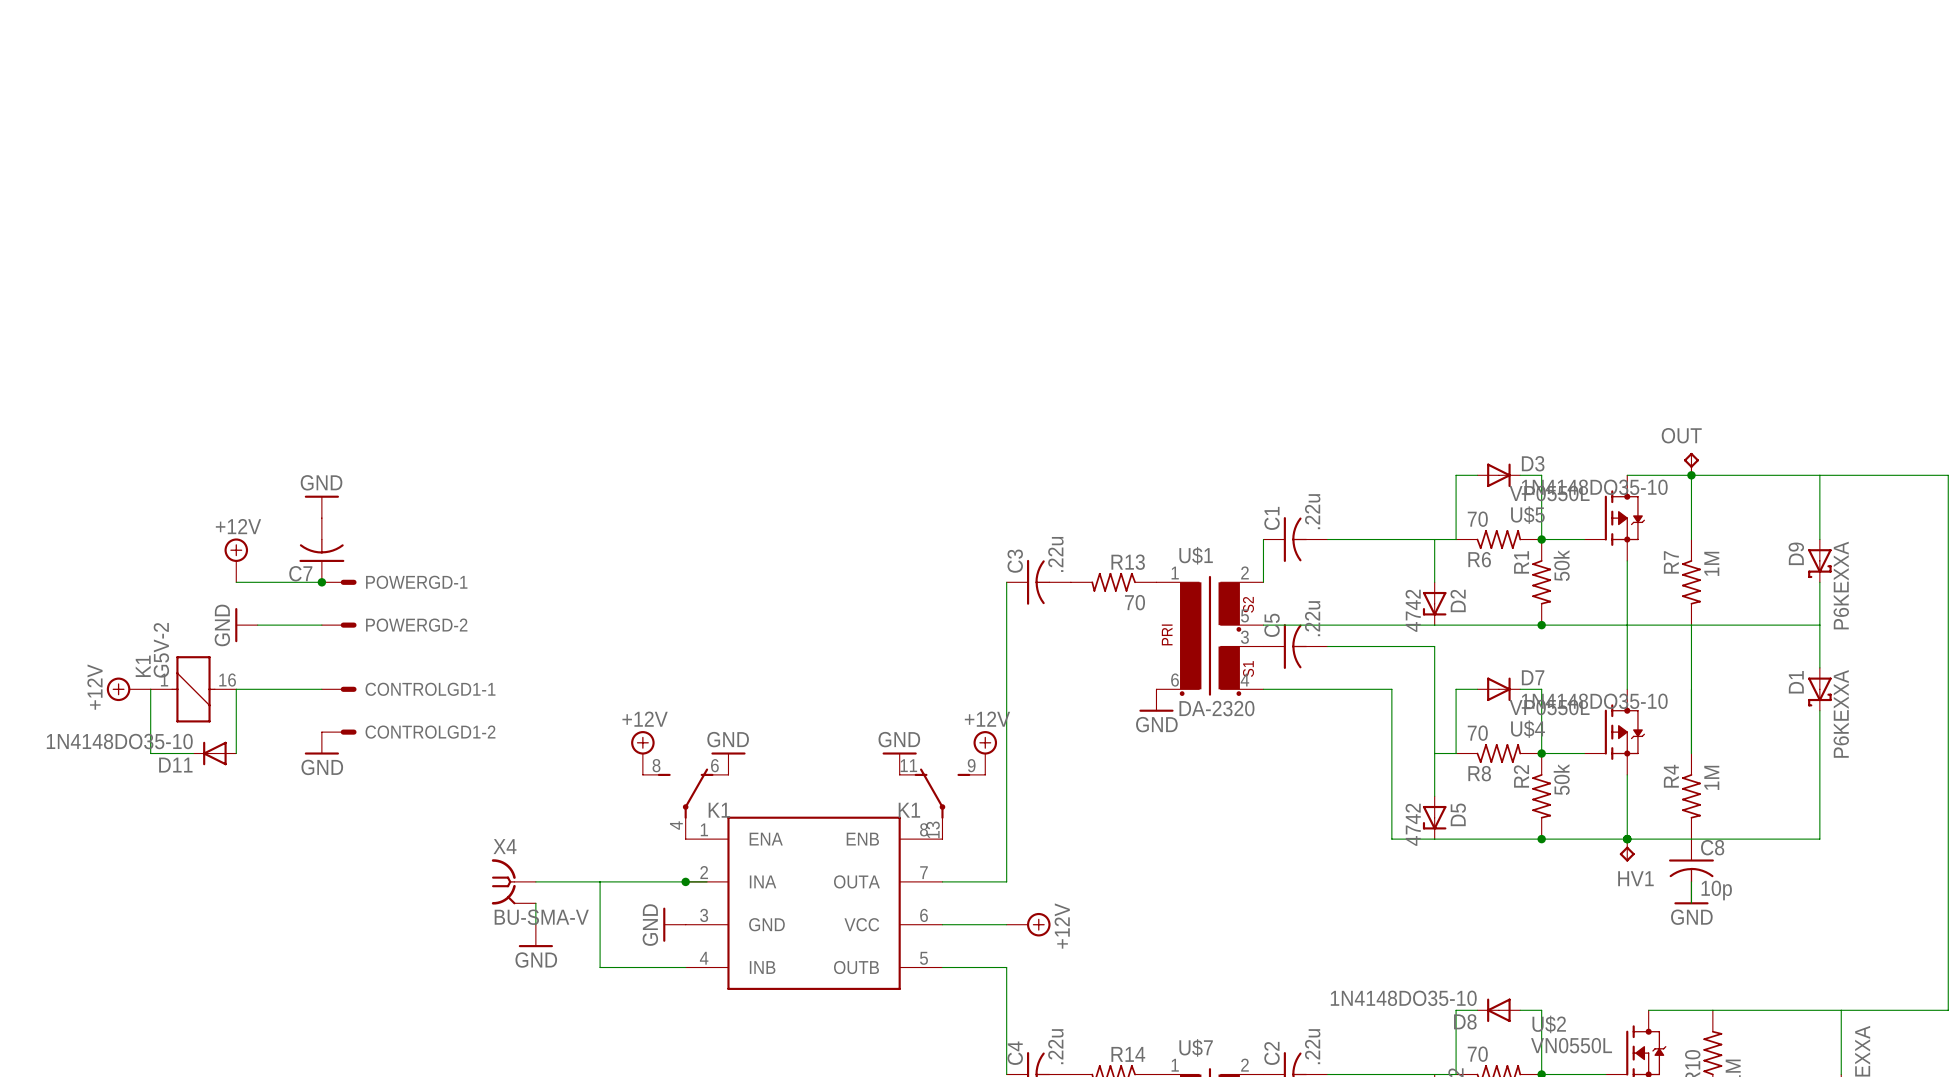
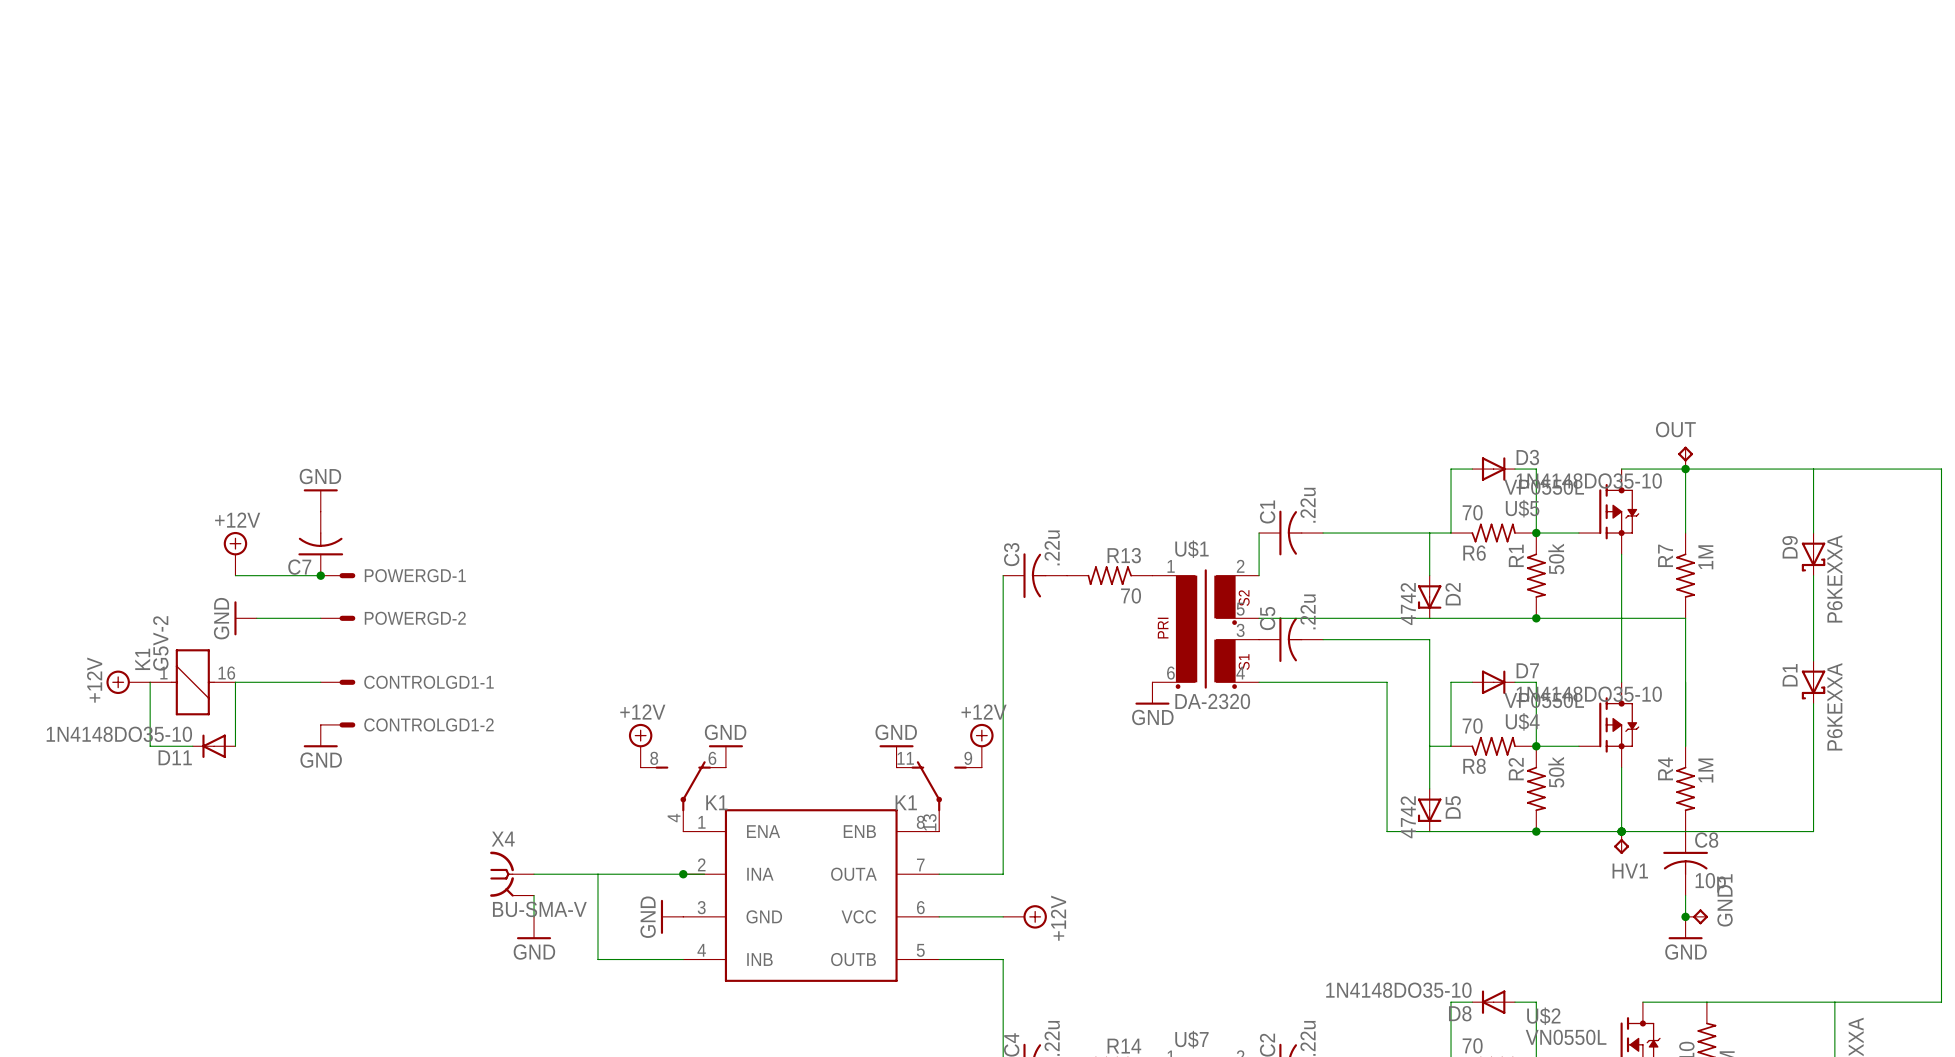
wire: (1691, 625) (1819, 625) -> none
power symbol position: GND (1691, 893) -> GND (1685, 928)
junction: none -> (1685, 916)
GND1: none -> (1696, 916)

